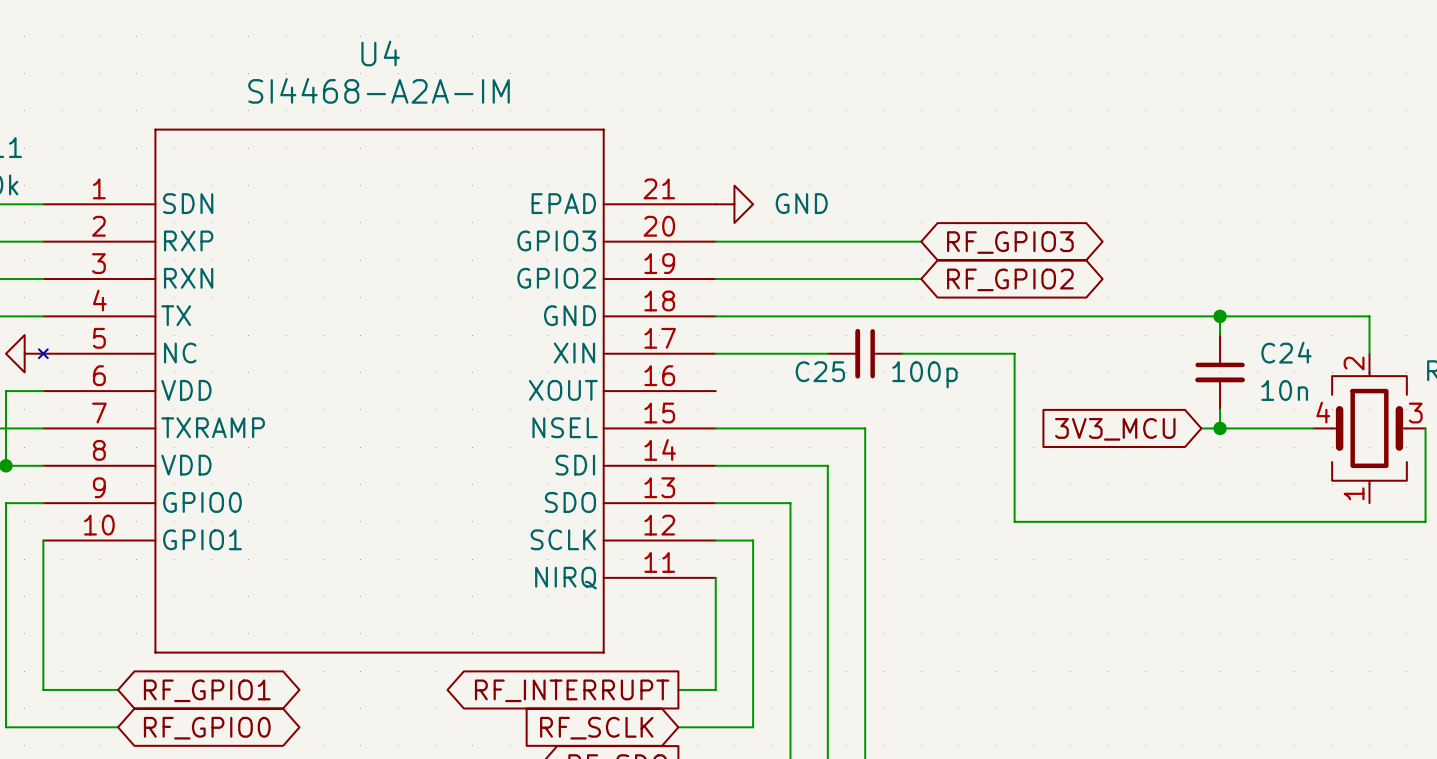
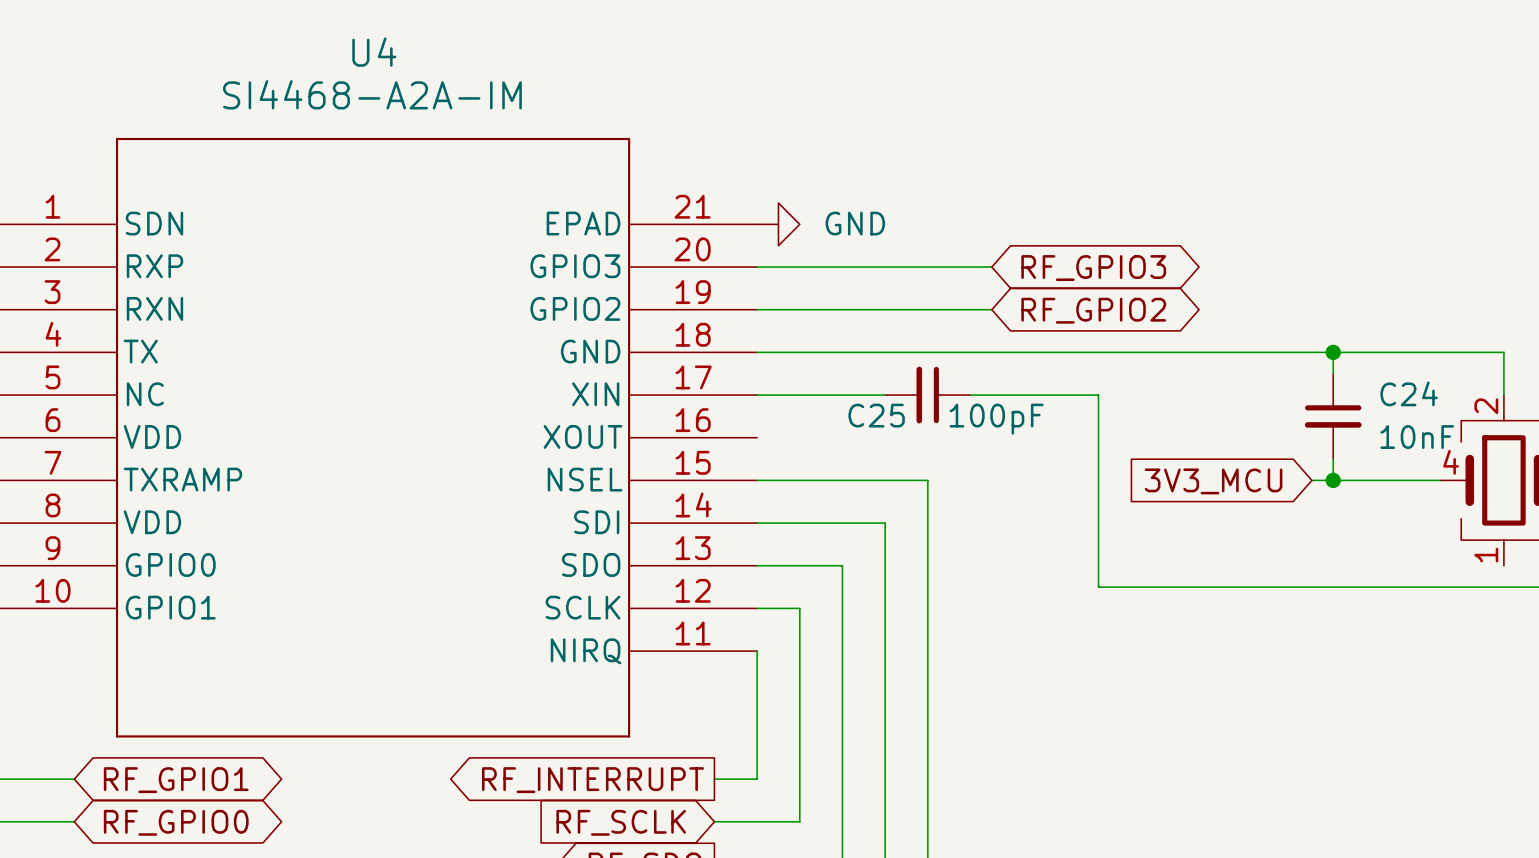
C25 value: 100p (924, 374) -> 100pF (996, 419)
C24 value: 10n (1284, 390) -> 10nF (1417, 437)

